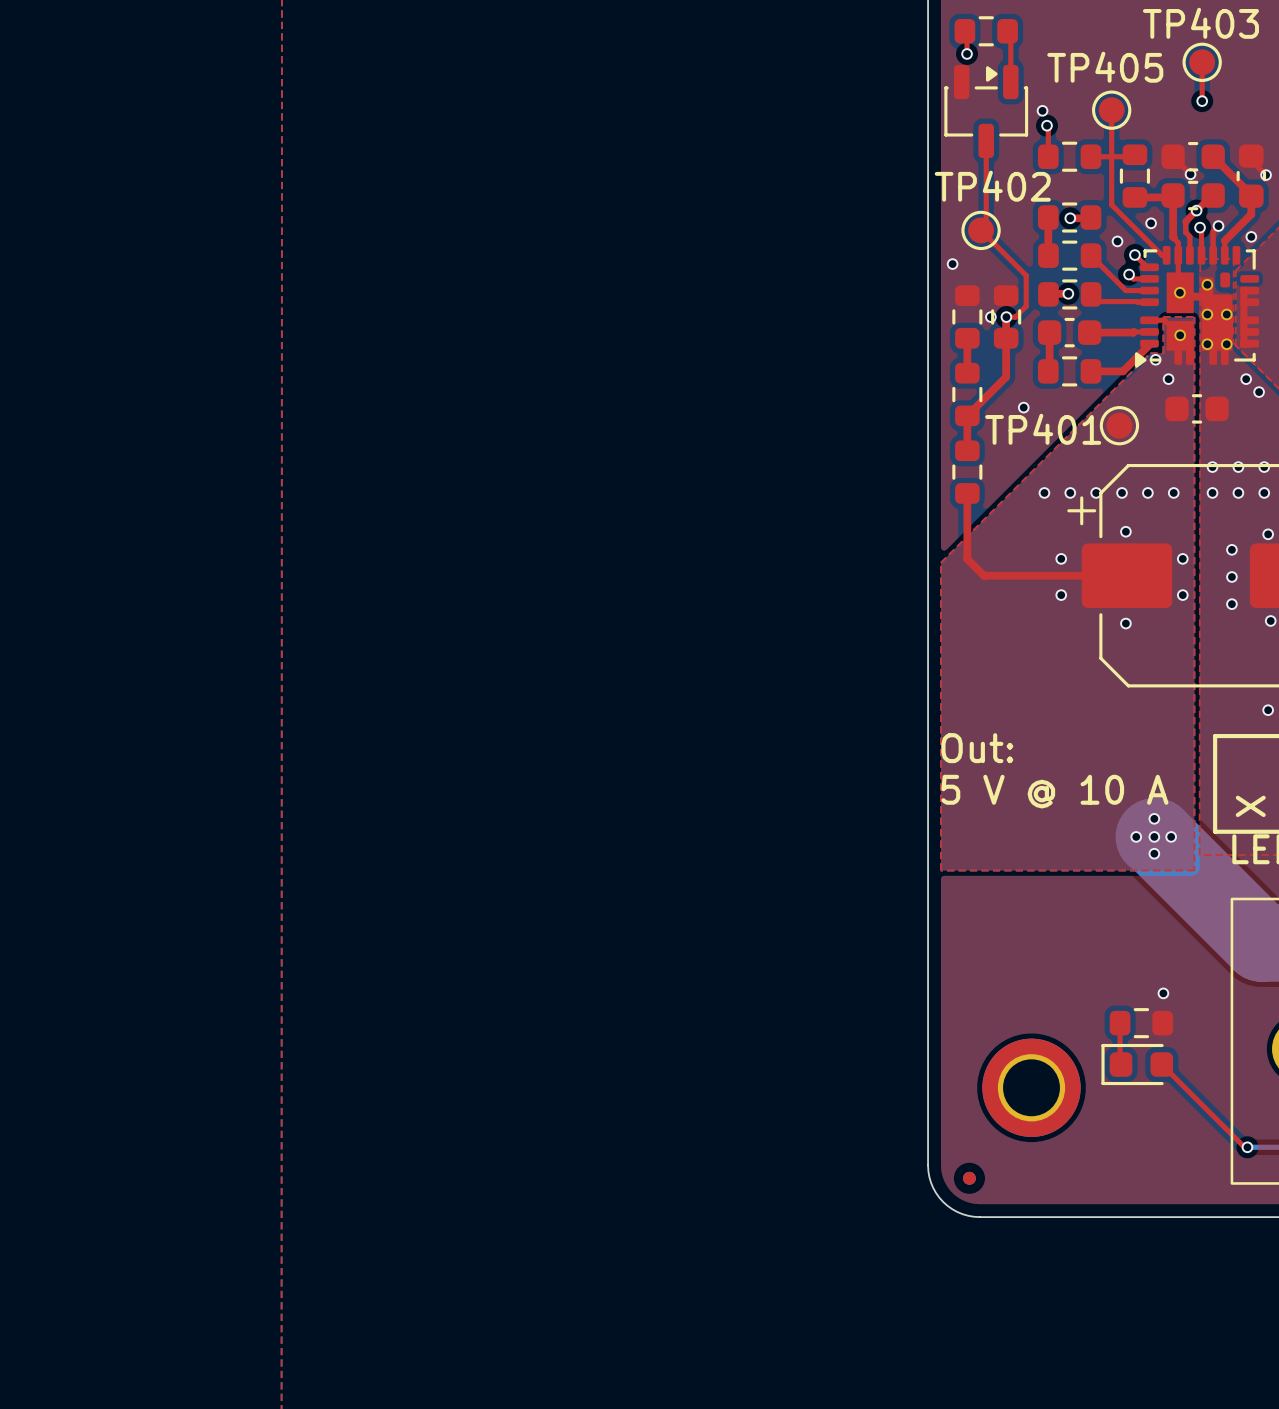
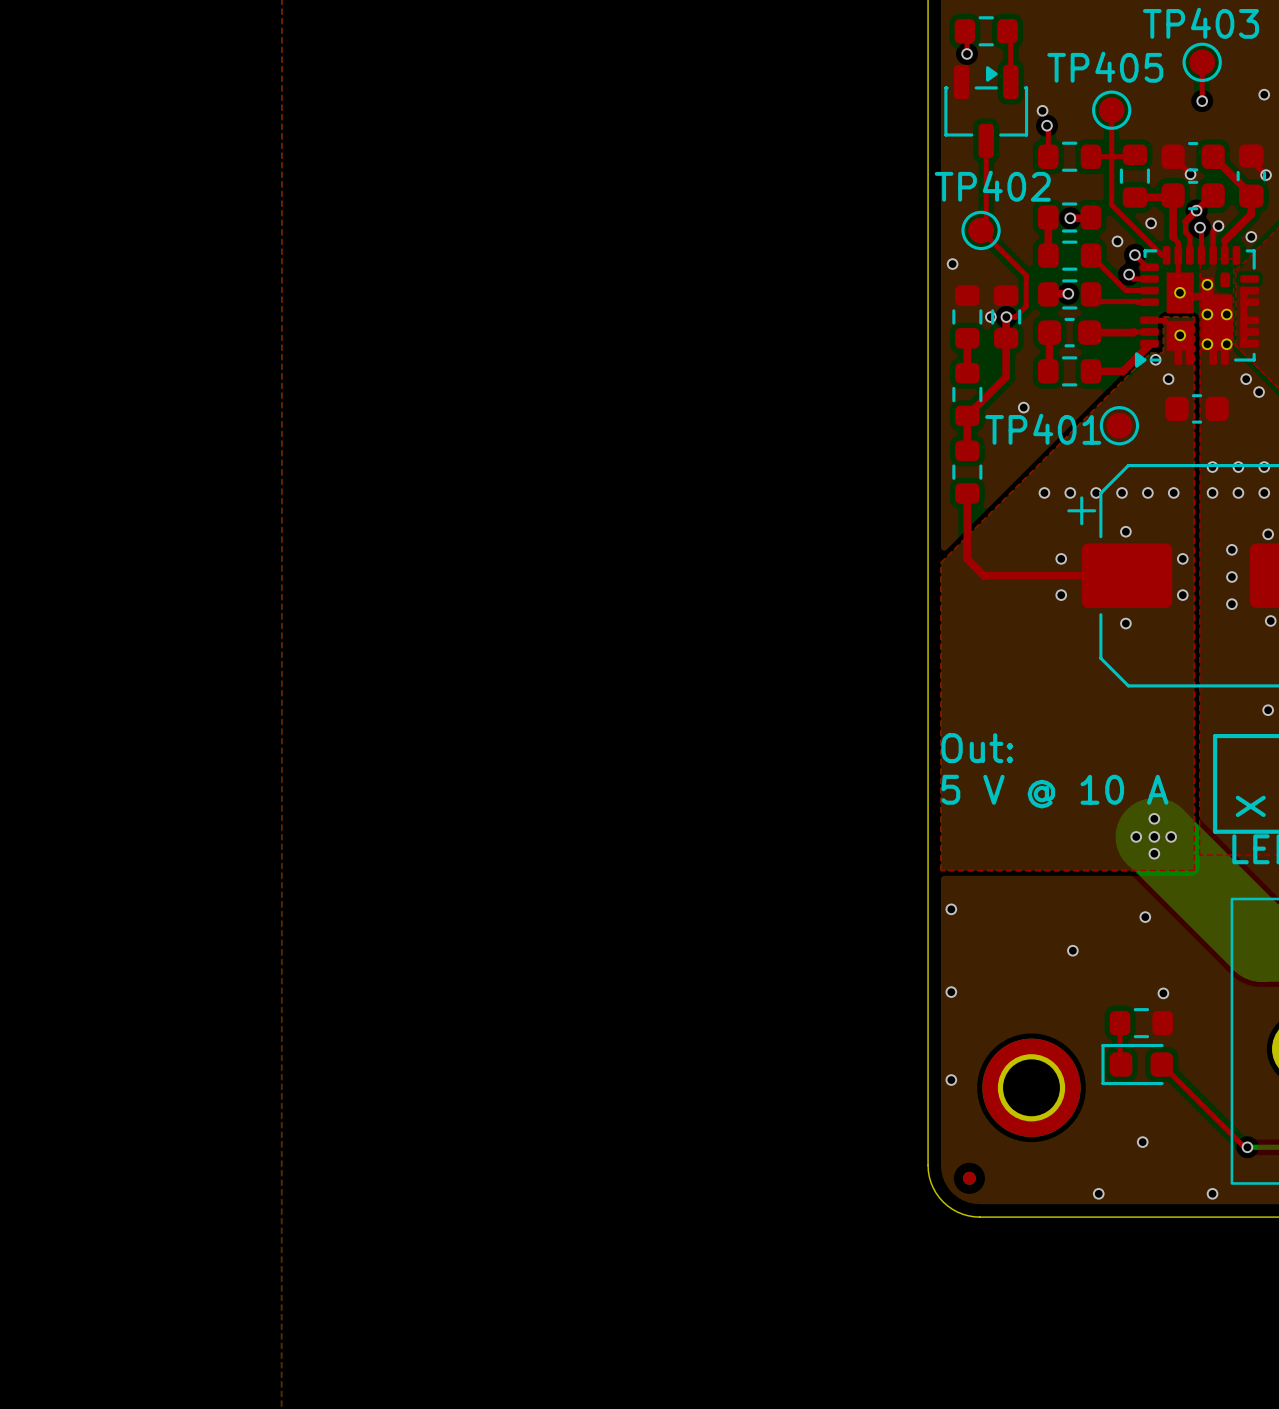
via: none -> (1264, 94)
via: none -> (951, 909)
via: none -> (1145, 917)
via: none -> (1072, 950)
via: none -> (951, 992)
via: none -> (951, 1080)
via: none -> (1142, 1142)
via: none -> (1098, 1193)
via: none -> (1212, 1193)

